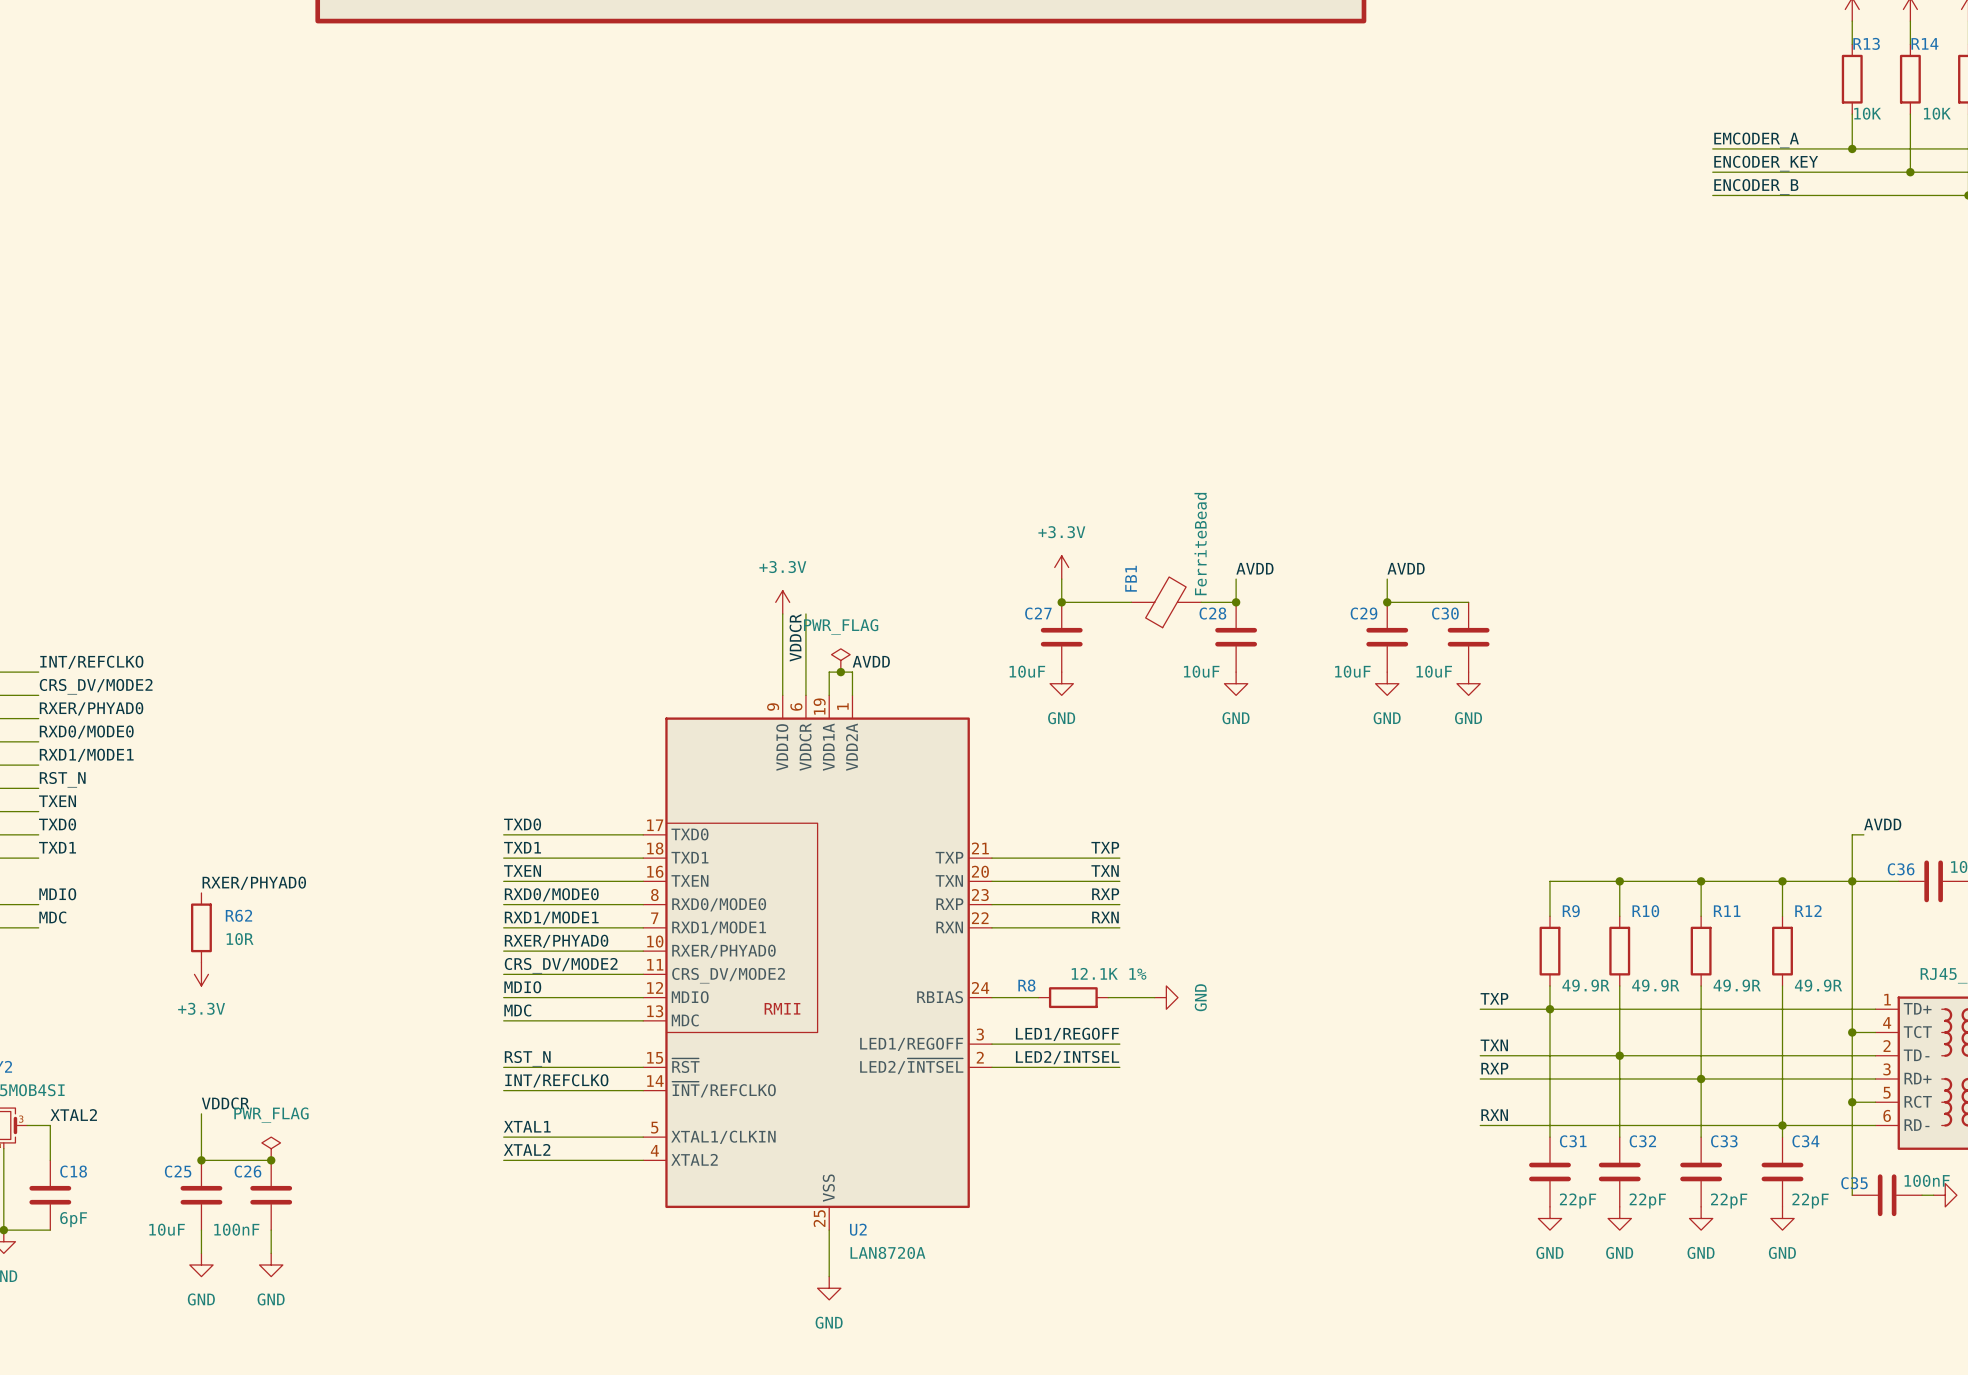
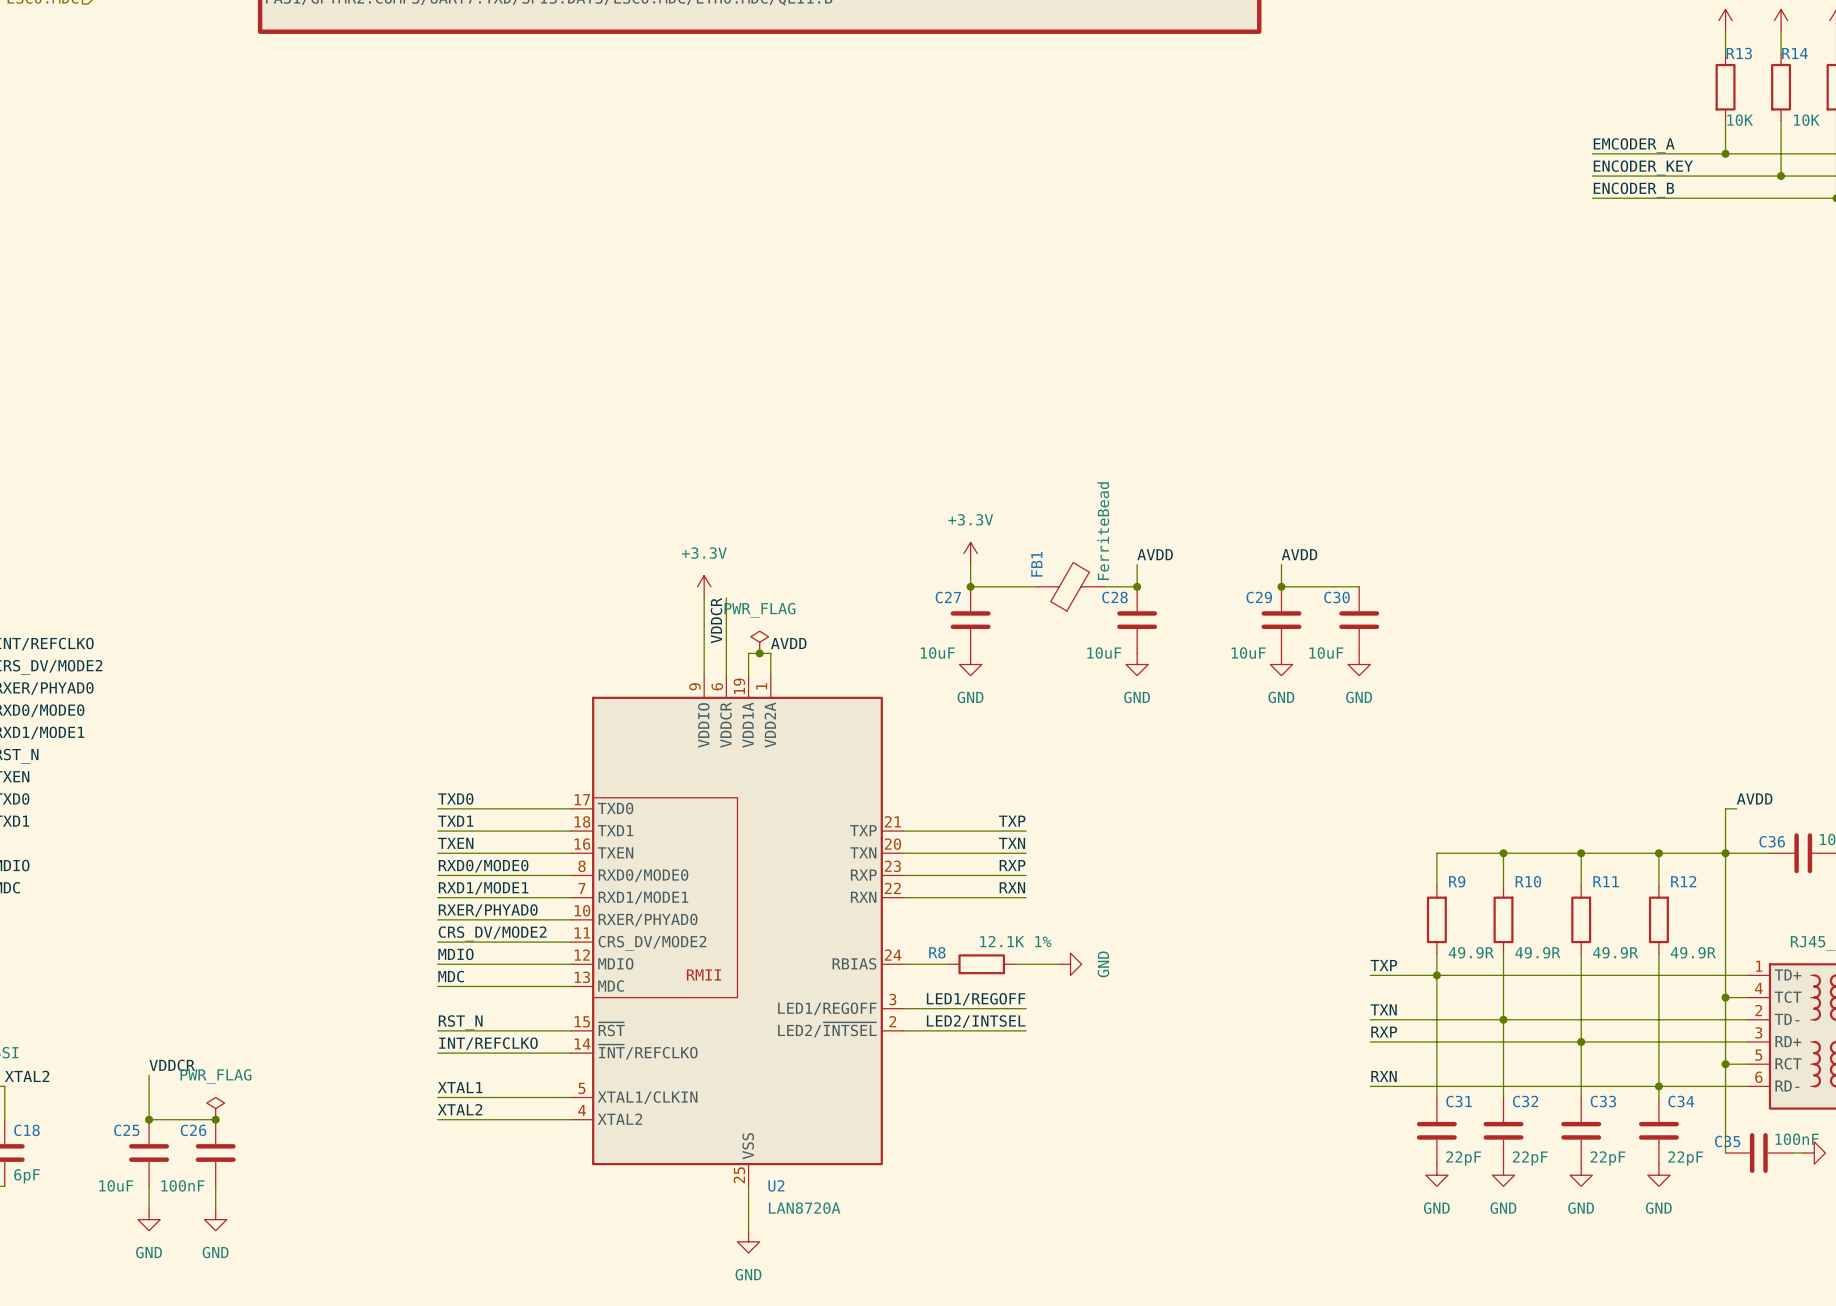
label: RXER/PHYAD0 (254, 883) -> none
R62: 10R (201, 927) -> none
power symbol: +3.3V (201, 974) -> none

